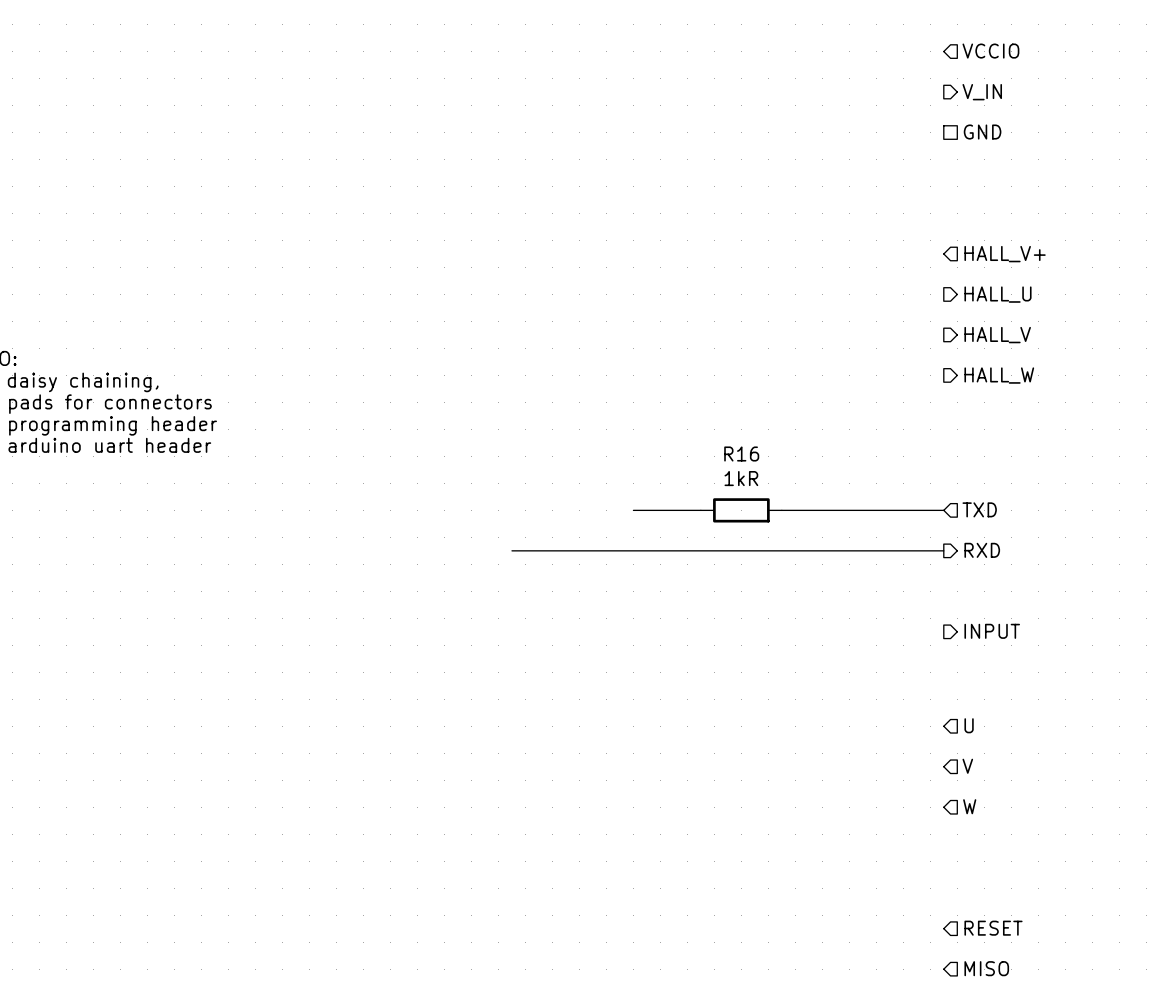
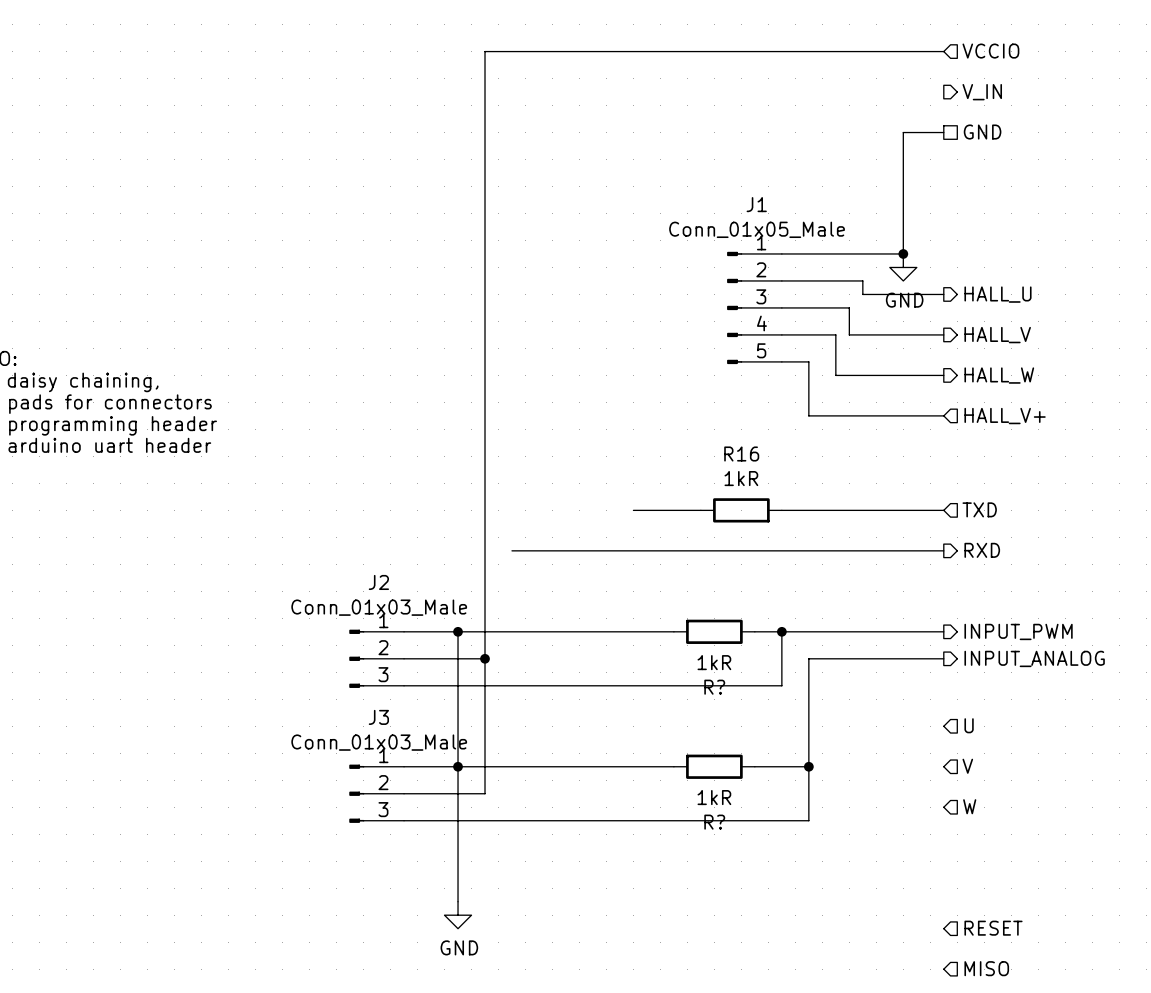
wire: none -> (943, 51) (485, 51) (485, 793) (404, 793)
wire: none -> (943, 132) (903, 132) (903, 253) (781, 253)
junction: none -> (903, 253)
hierarchical label position: HALL_V+ (1005, 254) -> HALL_V+ (1005, 416)
power symbol: none -> GND (903, 267)
wire: none -> (781, 280) (862, 280) (862, 294) (943, 294)
J1: none -> Conn_01x05_Male (754, 307)
wire: none -> (781, 307) (849, 307) (849, 334) (943, 334)
wire: none -> (781, 334) (835, 334) (835, 375) (943, 375)
wire: none -> (781, 361) (808, 361) (808, 415) (943, 415)
wire: none -> (404, 631) (673, 631)
wire: none -> (458, 631) (458, 901)
junction: none -> (458, 631)
R?: none -> 1kR (714, 631)
wire: none -> (754, 631) (943, 631)
wire: none -> (781, 631) (781, 685) (404, 685)
junction: none -> (781, 631)
hierarchical label: INPUT (992, 631) -> INPUT_PWM (1018, 631)
J2: none -> Conn_01x03_Male (376, 658)
wire: none -> (404, 658) (485, 658)
junction: none -> (485, 658)
wire: none -> (943, 658) (808, 658) (808, 820) (404, 820)
hierarchical label: none -> INPUT_ANALOG (1034, 658)
wire: none -> (404, 766) (673, 766)
junction: none -> (458, 766)
R?: none -> 1kR (714, 766)
wire: none -> (754, 766) (808, 766)
junction: none -> (808, 766)
J3: none -> Conn_01x03_Male (376, 793)
power symbol: none -> GND (458, 915)

